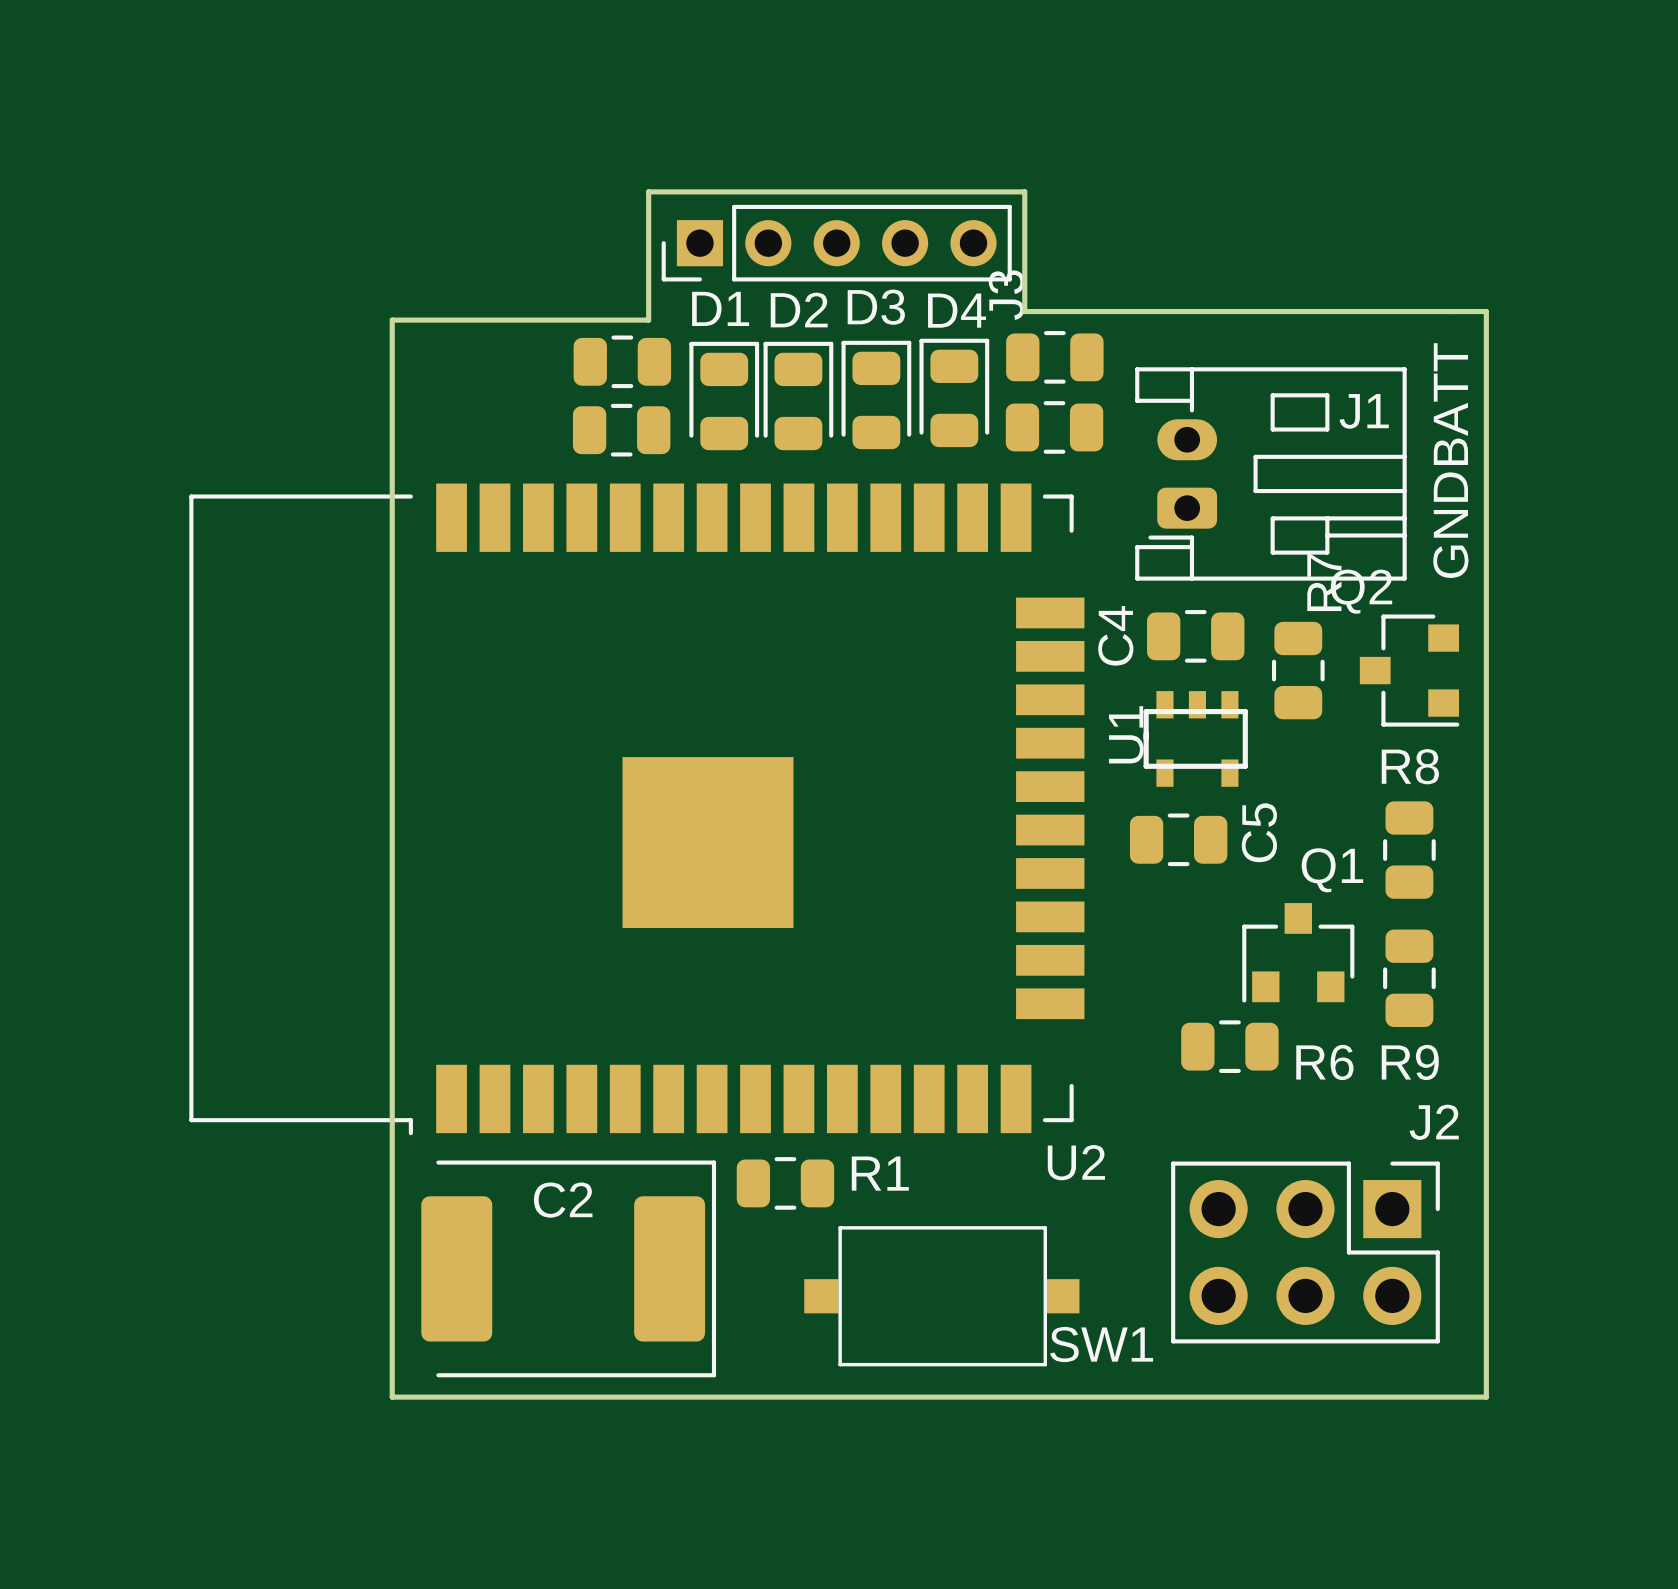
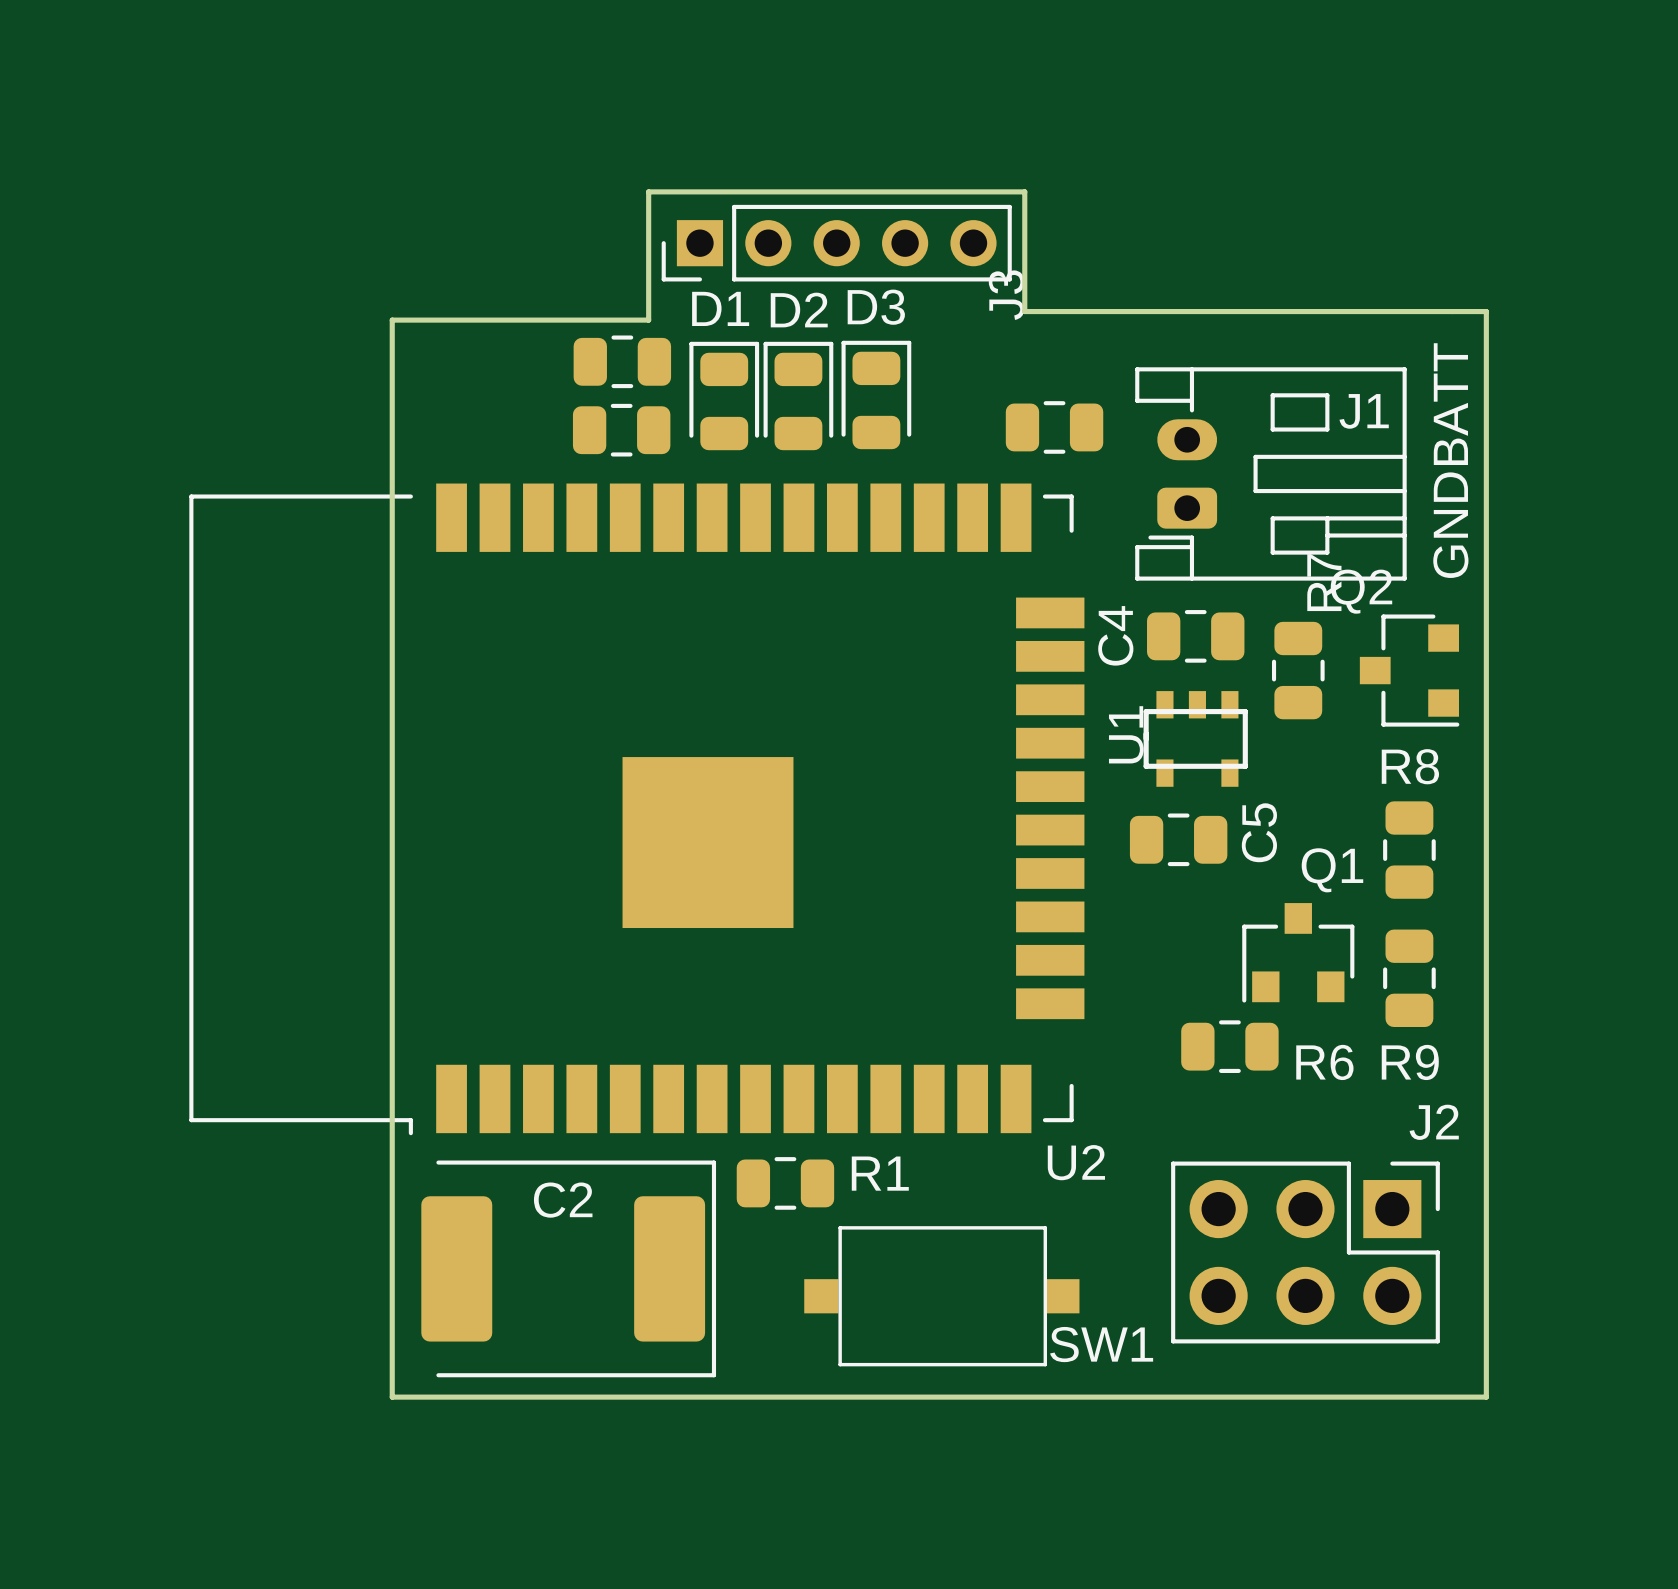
part: (1054, 357) -> none
D4: (954, 392) -> none

